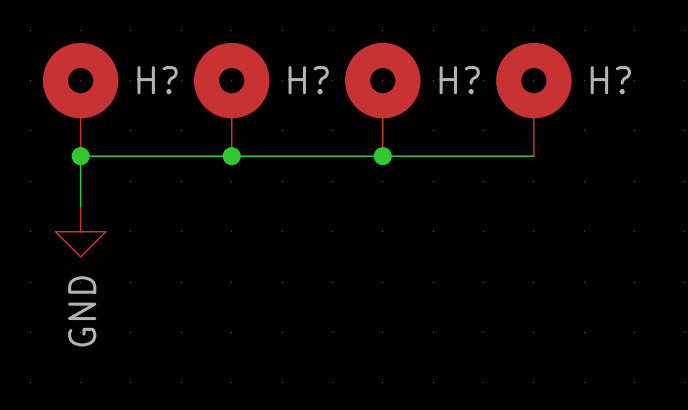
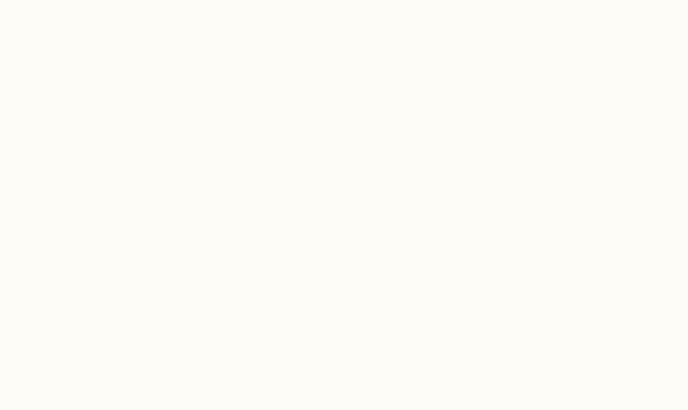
H?: (80, 99) -> none
H?: (231, 99) -> none
H?: (382, 99) -> none
H?: (533, 99) -> none
junction: (80, 156) -> none
junction: (231, 156) -> none
junction: (382, 156) -> none
wire: (533, 156) (80, 156) (80, 206) -> none
power symbol: GND (80, 231) -> none

